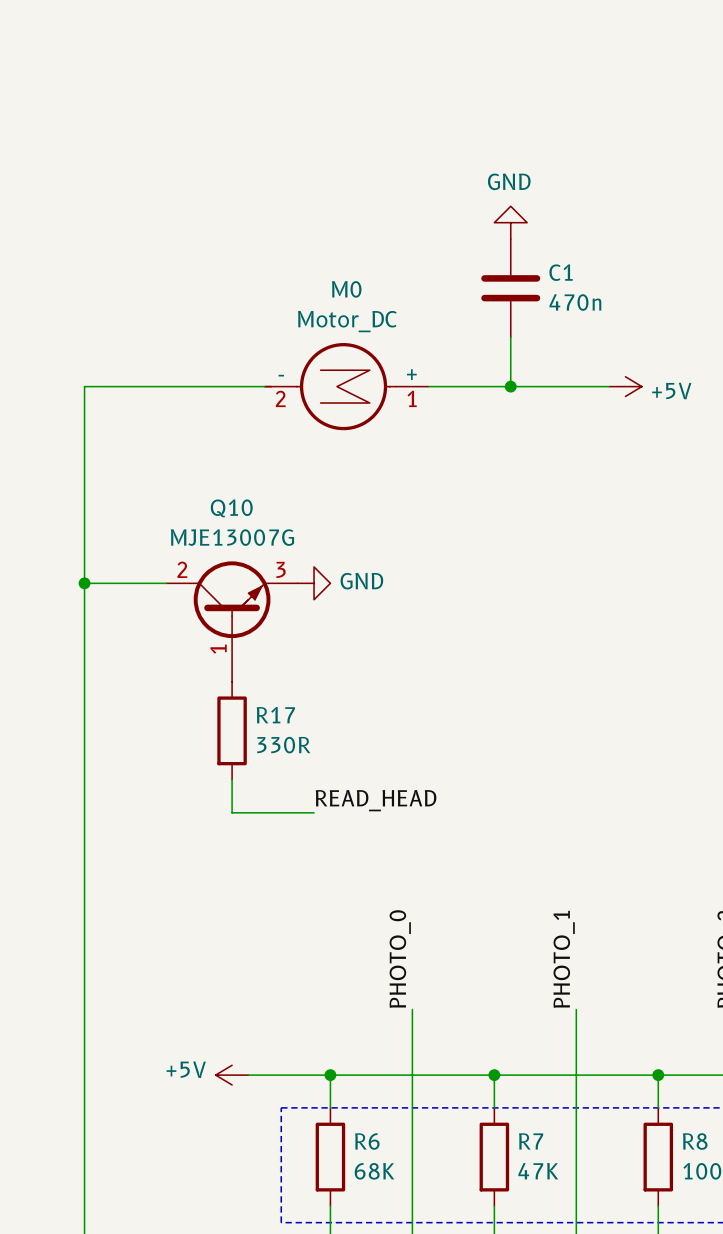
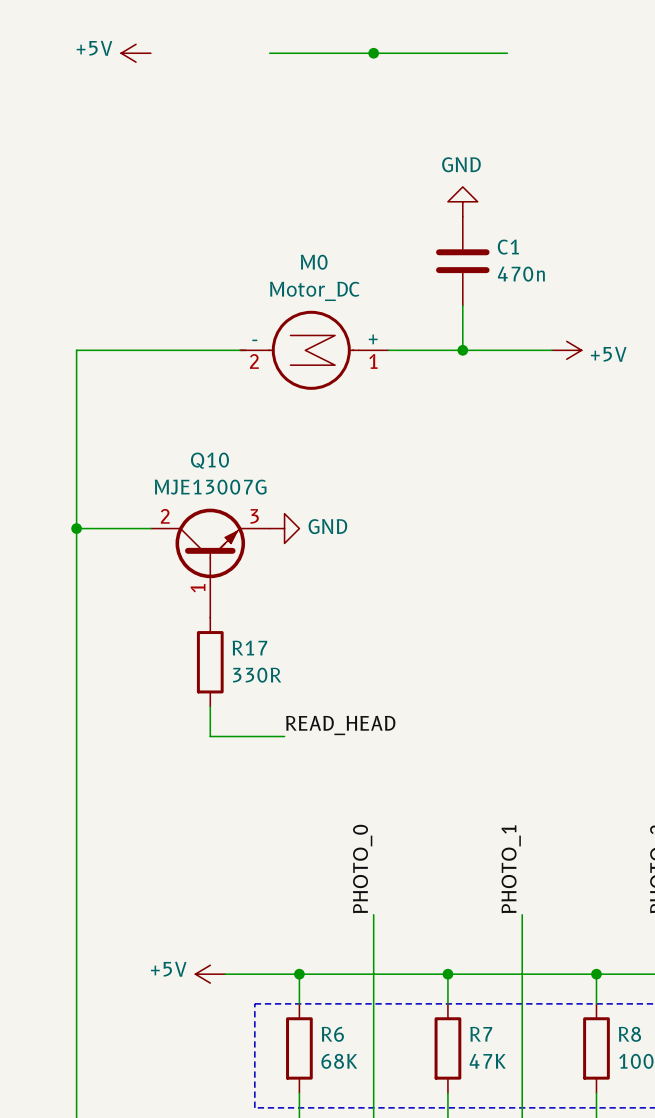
power symbol: none -> +5V (136, 53)
wire: none -> (269, 53) (507, 53)
junction: none -> (373, 53)

